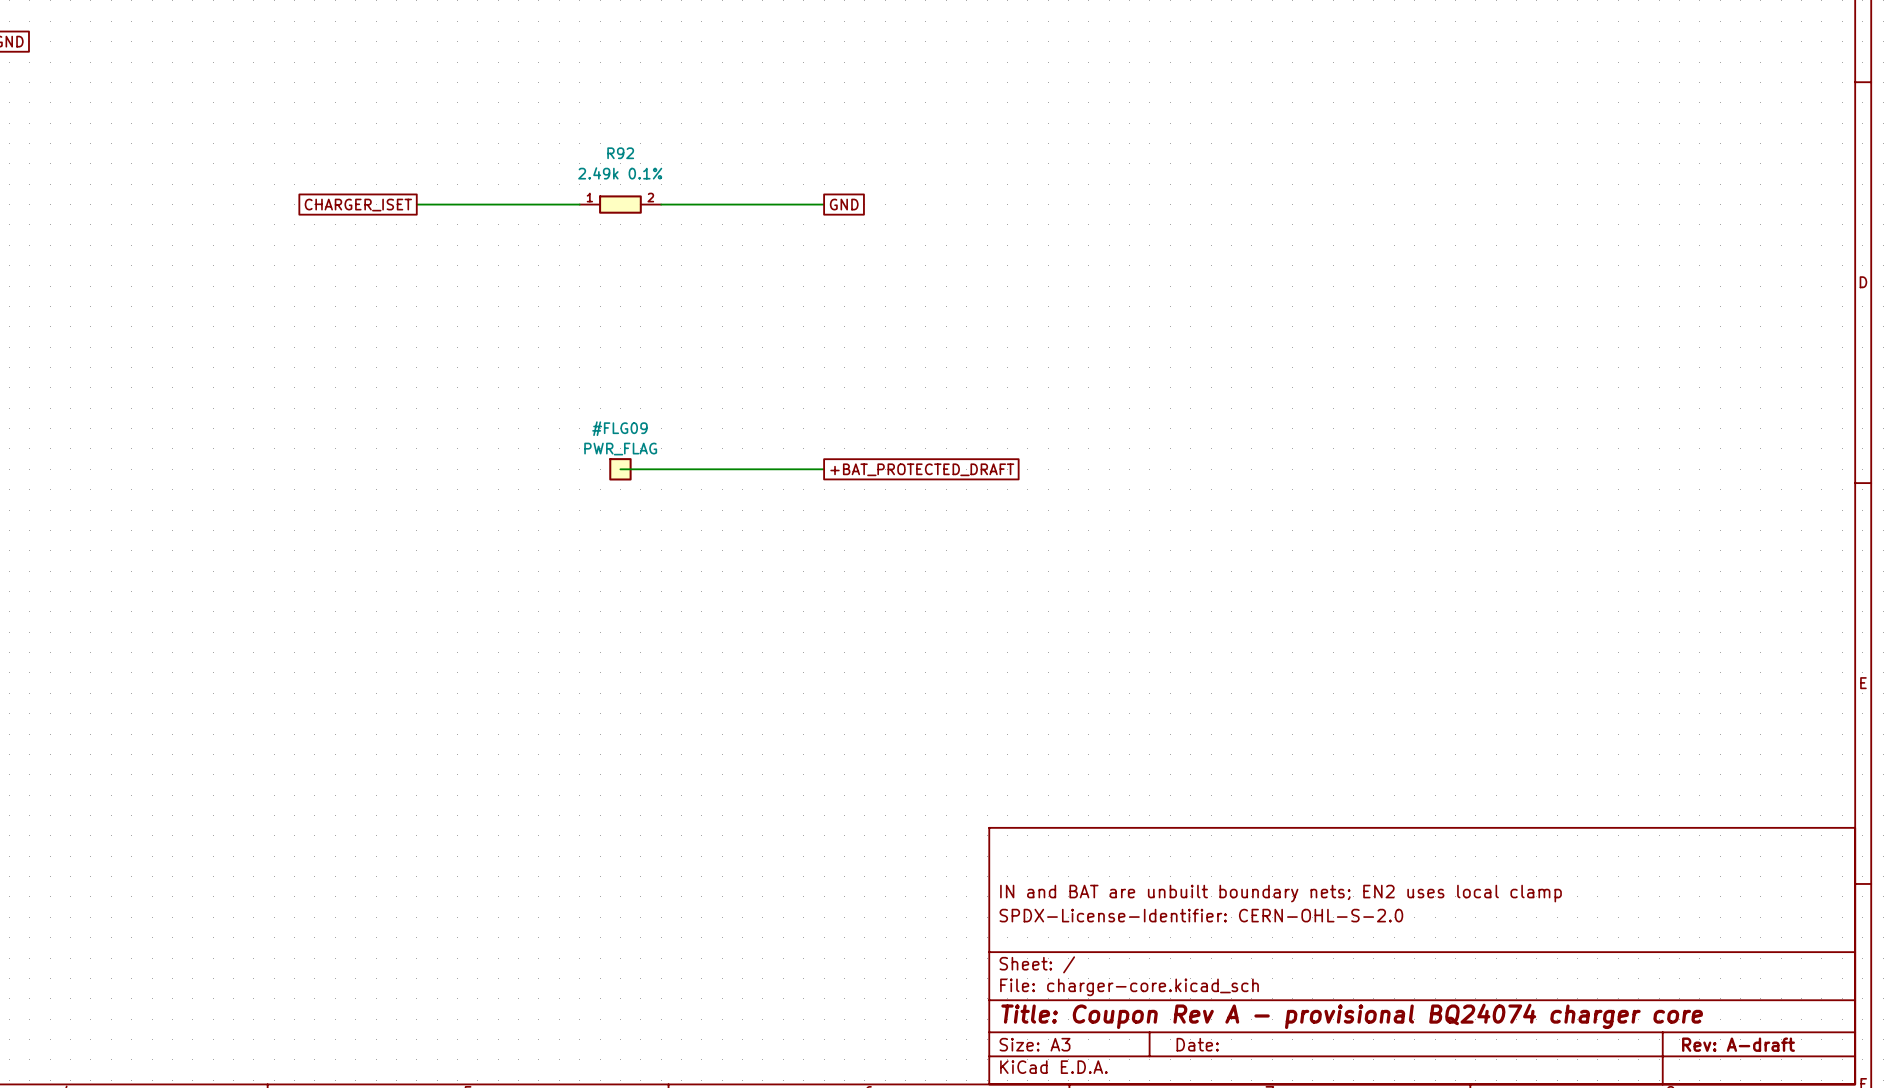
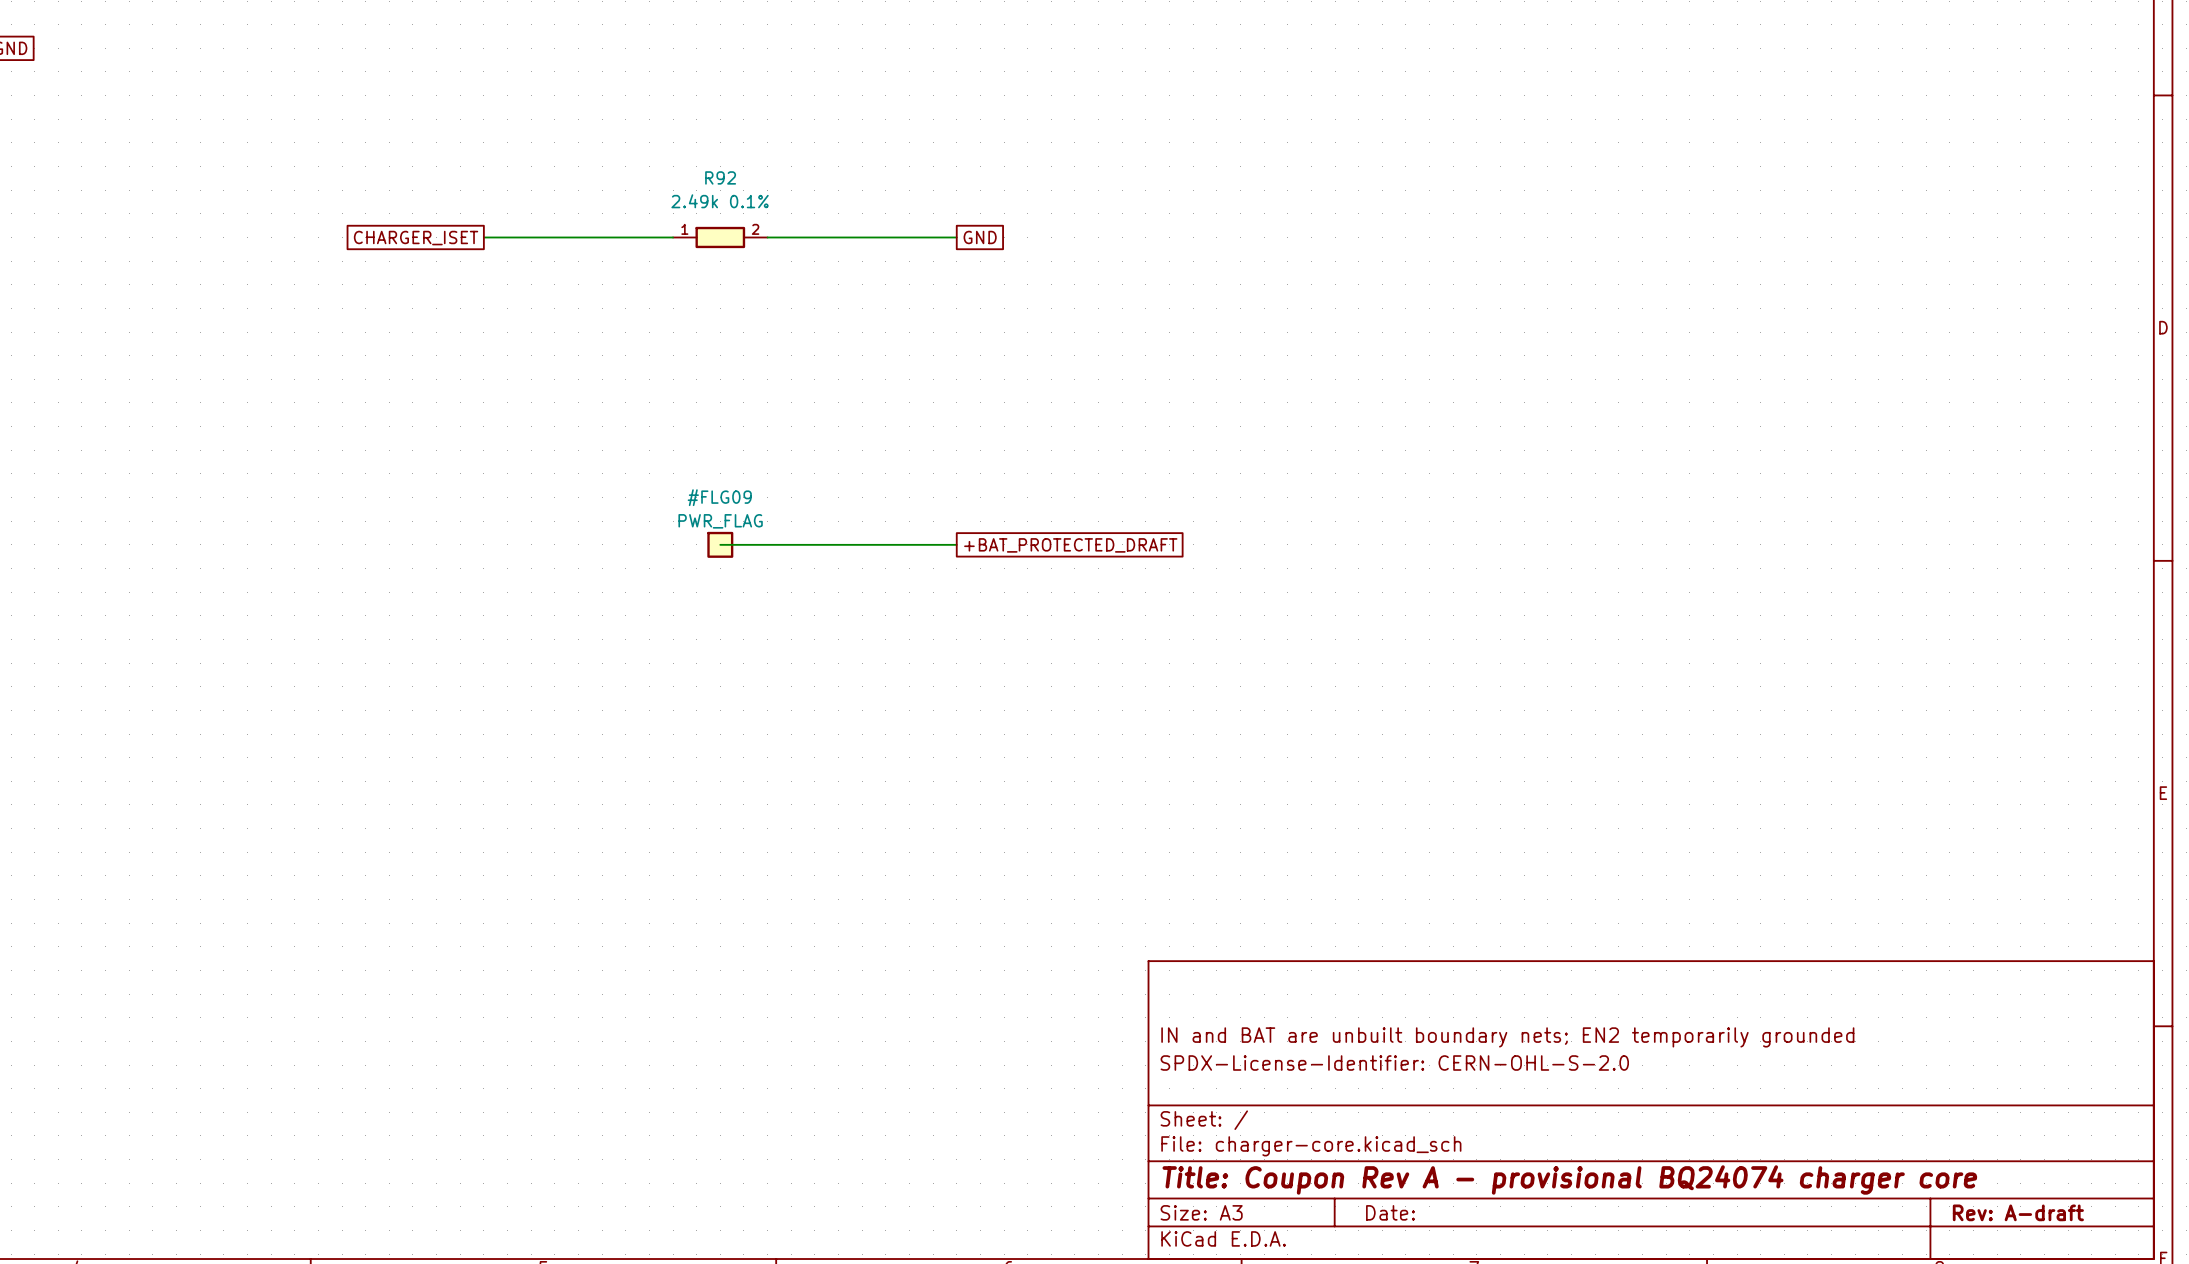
title block: IN and BAT are unbuilt boundary nets; EN2 uses local clamp (1280, 893) -> IN and BAT are unbuilt boundary nets; EN2 temporarily grounded (1507, 1037)

